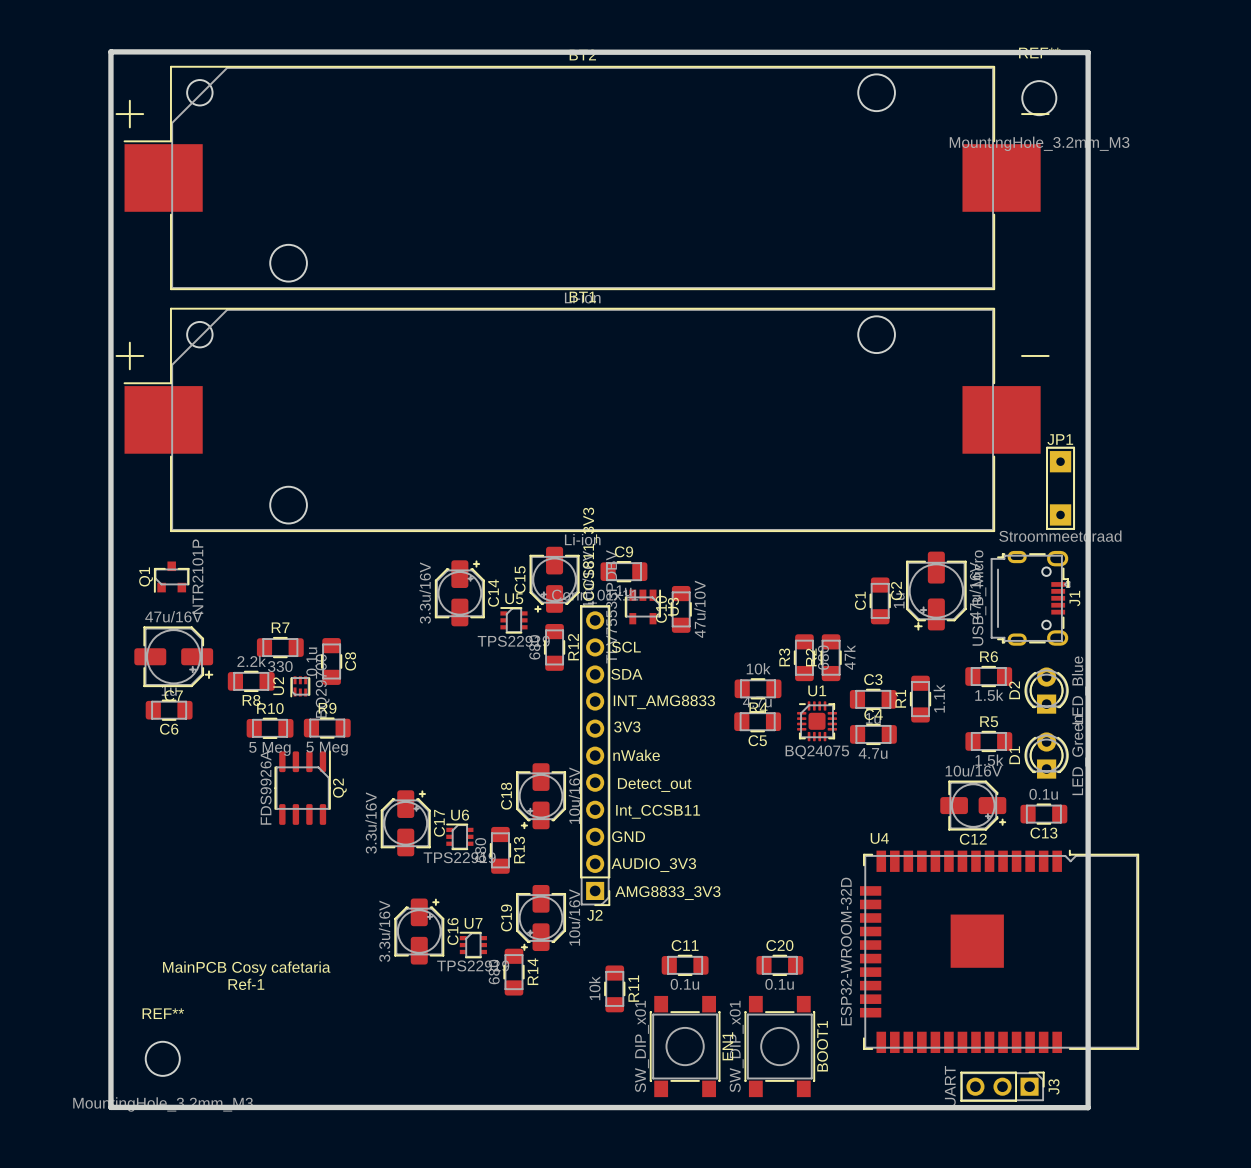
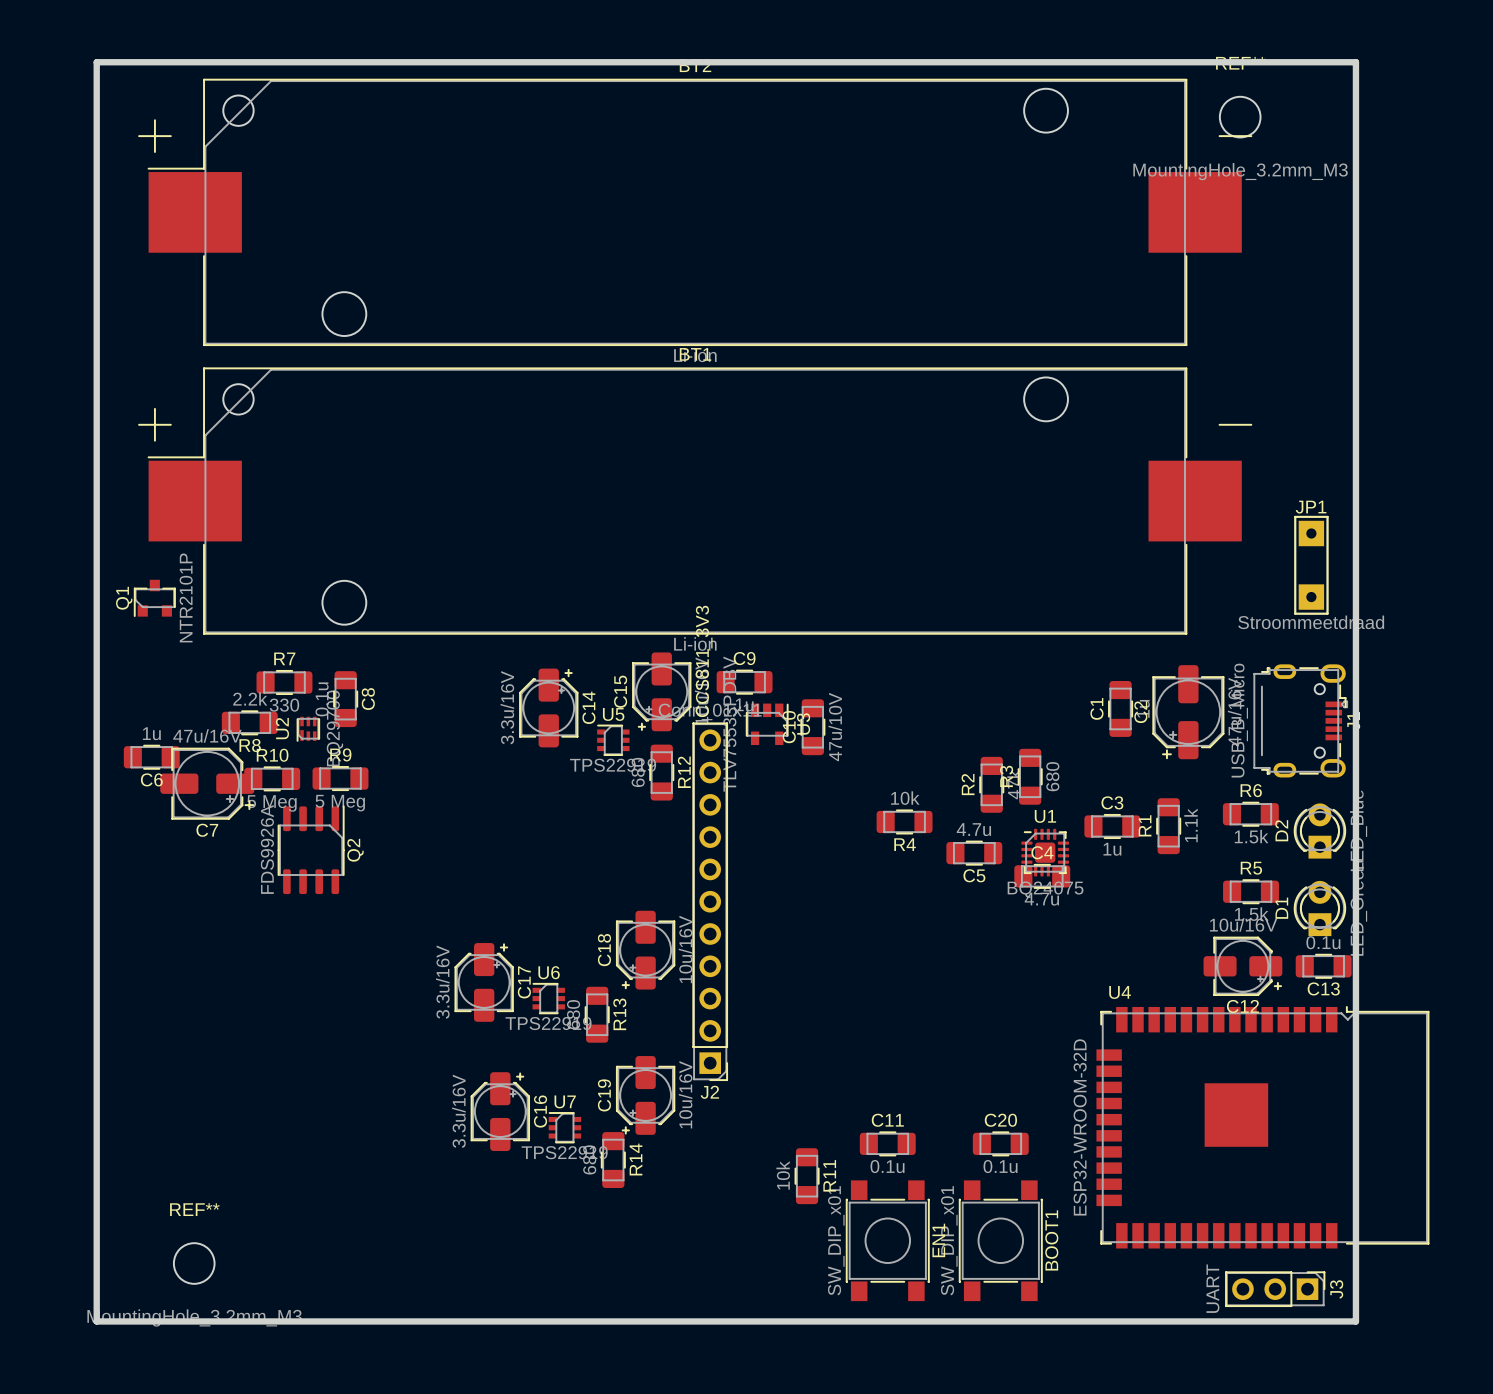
board edge: (110, 51) (110, 1107) (1088, 1107) (1088, 52) (110, 51) -> (96, 62) (96, 1321) (1355, 1321) (1355, 62) (96, 62)
JP1 position: (1060, 488) -> (1311, 565)
Q1 position: (171, 576) -> (154, 598)
C2 position: (936, 591) -> (1188, 712)
J1 position: (1030, 598) -> (1300, 720)
C1 position: (880, 600) -> (1120, 708)
R7 position: (280, 647) -> (284, 682)
text: SCL (626, 647) -> none
R3 position: (804, 657) -> (1030, 776)
C8 position: (331, 661) -> (345, 699)
text: SDA (626, 674) -> none
R6 position: (988, 676) -> (1250, 814)
R8 position: (251, 681) -> (249, 722)
U2 position: (300, 686) -> (308, 729)
D2 position: (1046, 690) -> (1319, 831)
C3 position: (873, 699) -> (1112, 826)
R1 position: (920, 699) -> (1168, 826)
text: INT_AMG8833 (664, 702) -> none
C6 position: (169, 710) -> (151, 757)
C5 position: (757, 721) -> (974, 853)
U1 position: (817, 721) -> (1045, 852)
text: 3V3 (627, 726) -> none
R10 position: (270, 728) -> (272, 778)
R9 position: (327, 728) -> (340, 778)
R5 position: (988, 741) -> (1251, 891)
text: nWake (636, 755) -> none
D1 position: (1046, 755) -> (1319, 908)
text: Detect_out (654, 785) -> none
Q2 position: (302, 787) -> (311, 849)
C12 position: (973, 805) -> (1242, 966)
text: Int_CCSB11 (658, 811) -> none
C13 position: (1043, 814) -> (1323, 966)
text: GND (628, 836) -> none
text: AUDIO_3V3 (653, 865) -> none
text: AMG8833_3V3 (667, 893) -> none
U4 position: (999, 951) -> (1262, 1127)
C11 position: (685, 965) -> (887, 1143)
C20 position: (779, 965) -> (1000, 1143)
text: MainPCB Cosy cafetaria (246, 968) -> none
text: Ref-1 (246, 984) -> none
R11 position: (614, 988) -> (807, 1176)
EN1 position: (685, 1046) -> (887, 1240)
BOOT1 position: (779, 1046) -> (1000, 1240)
J3 position: (1002, 1086) -> (1275, 1289)

